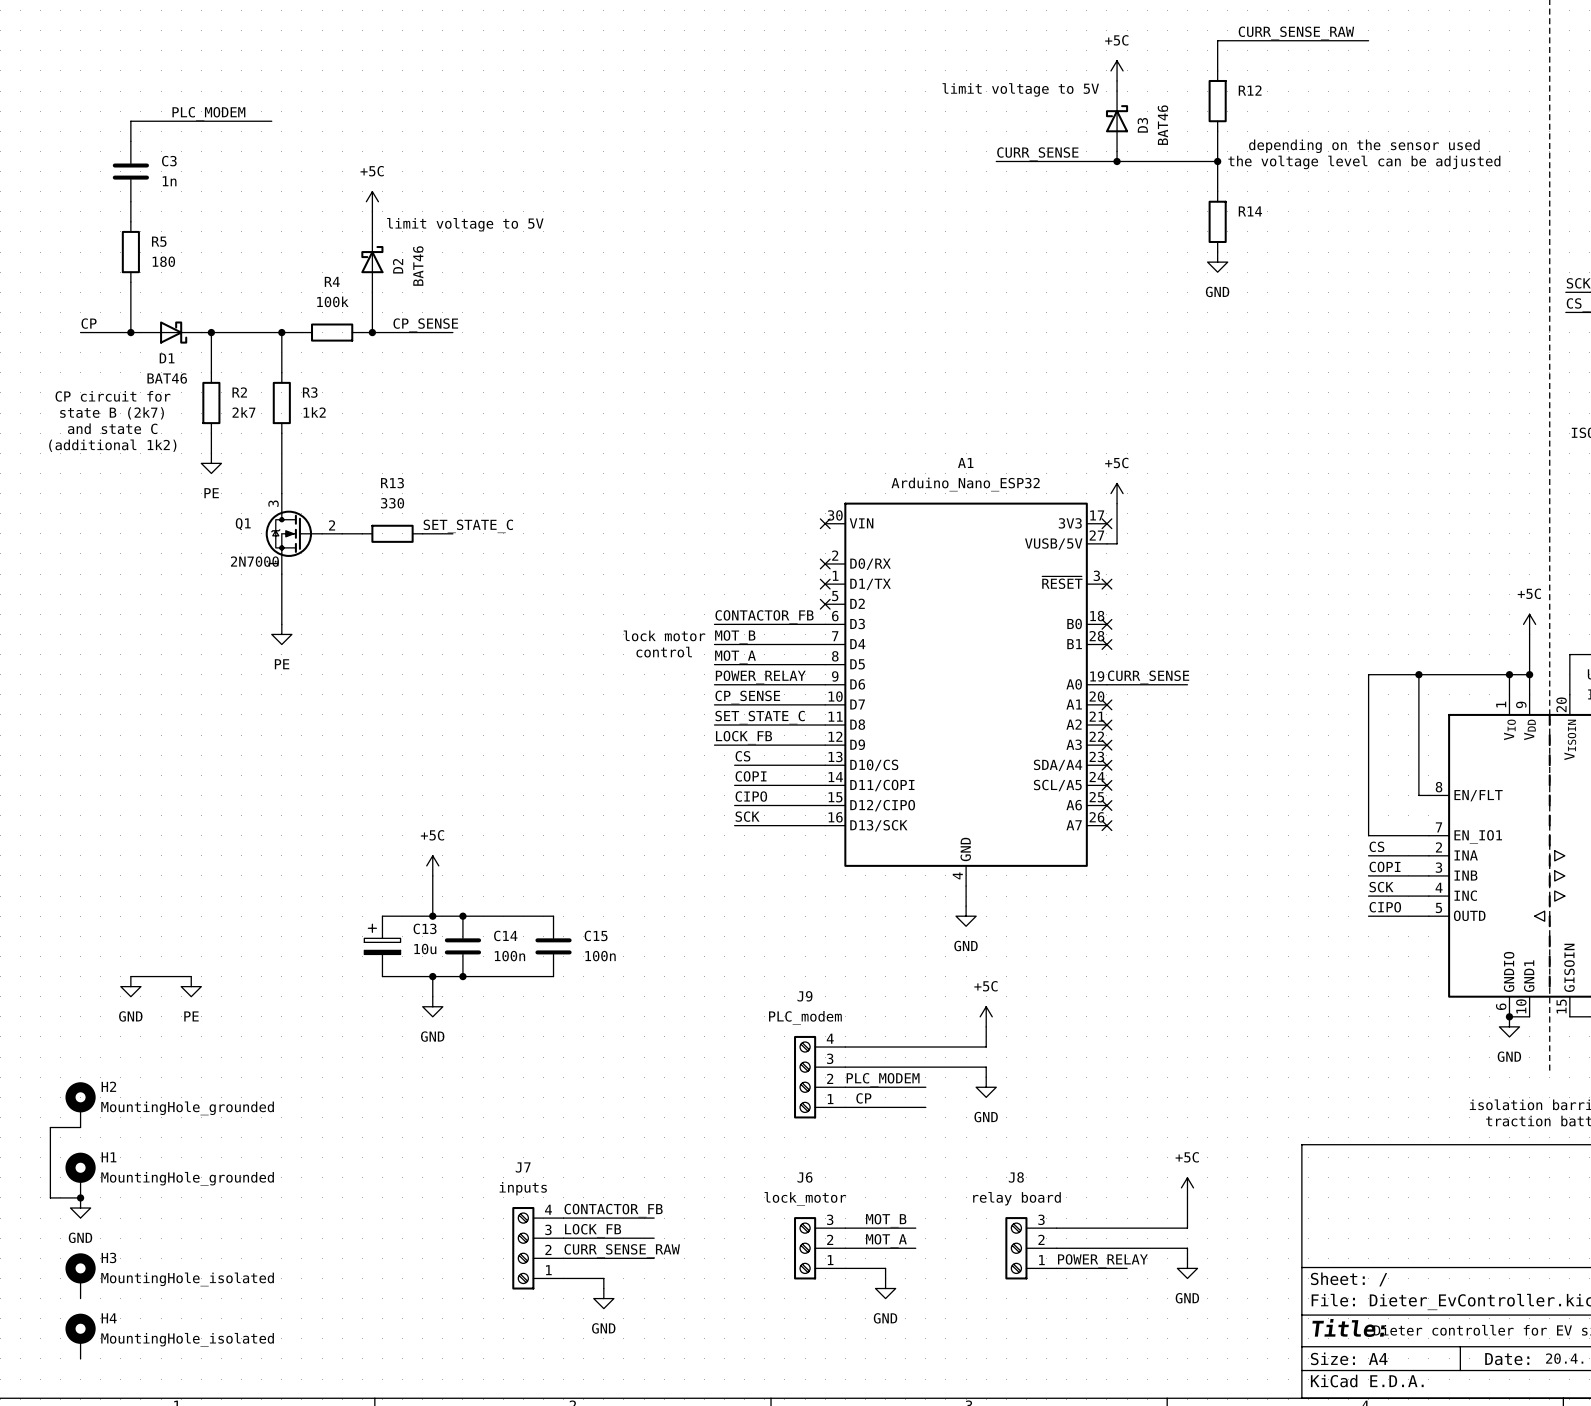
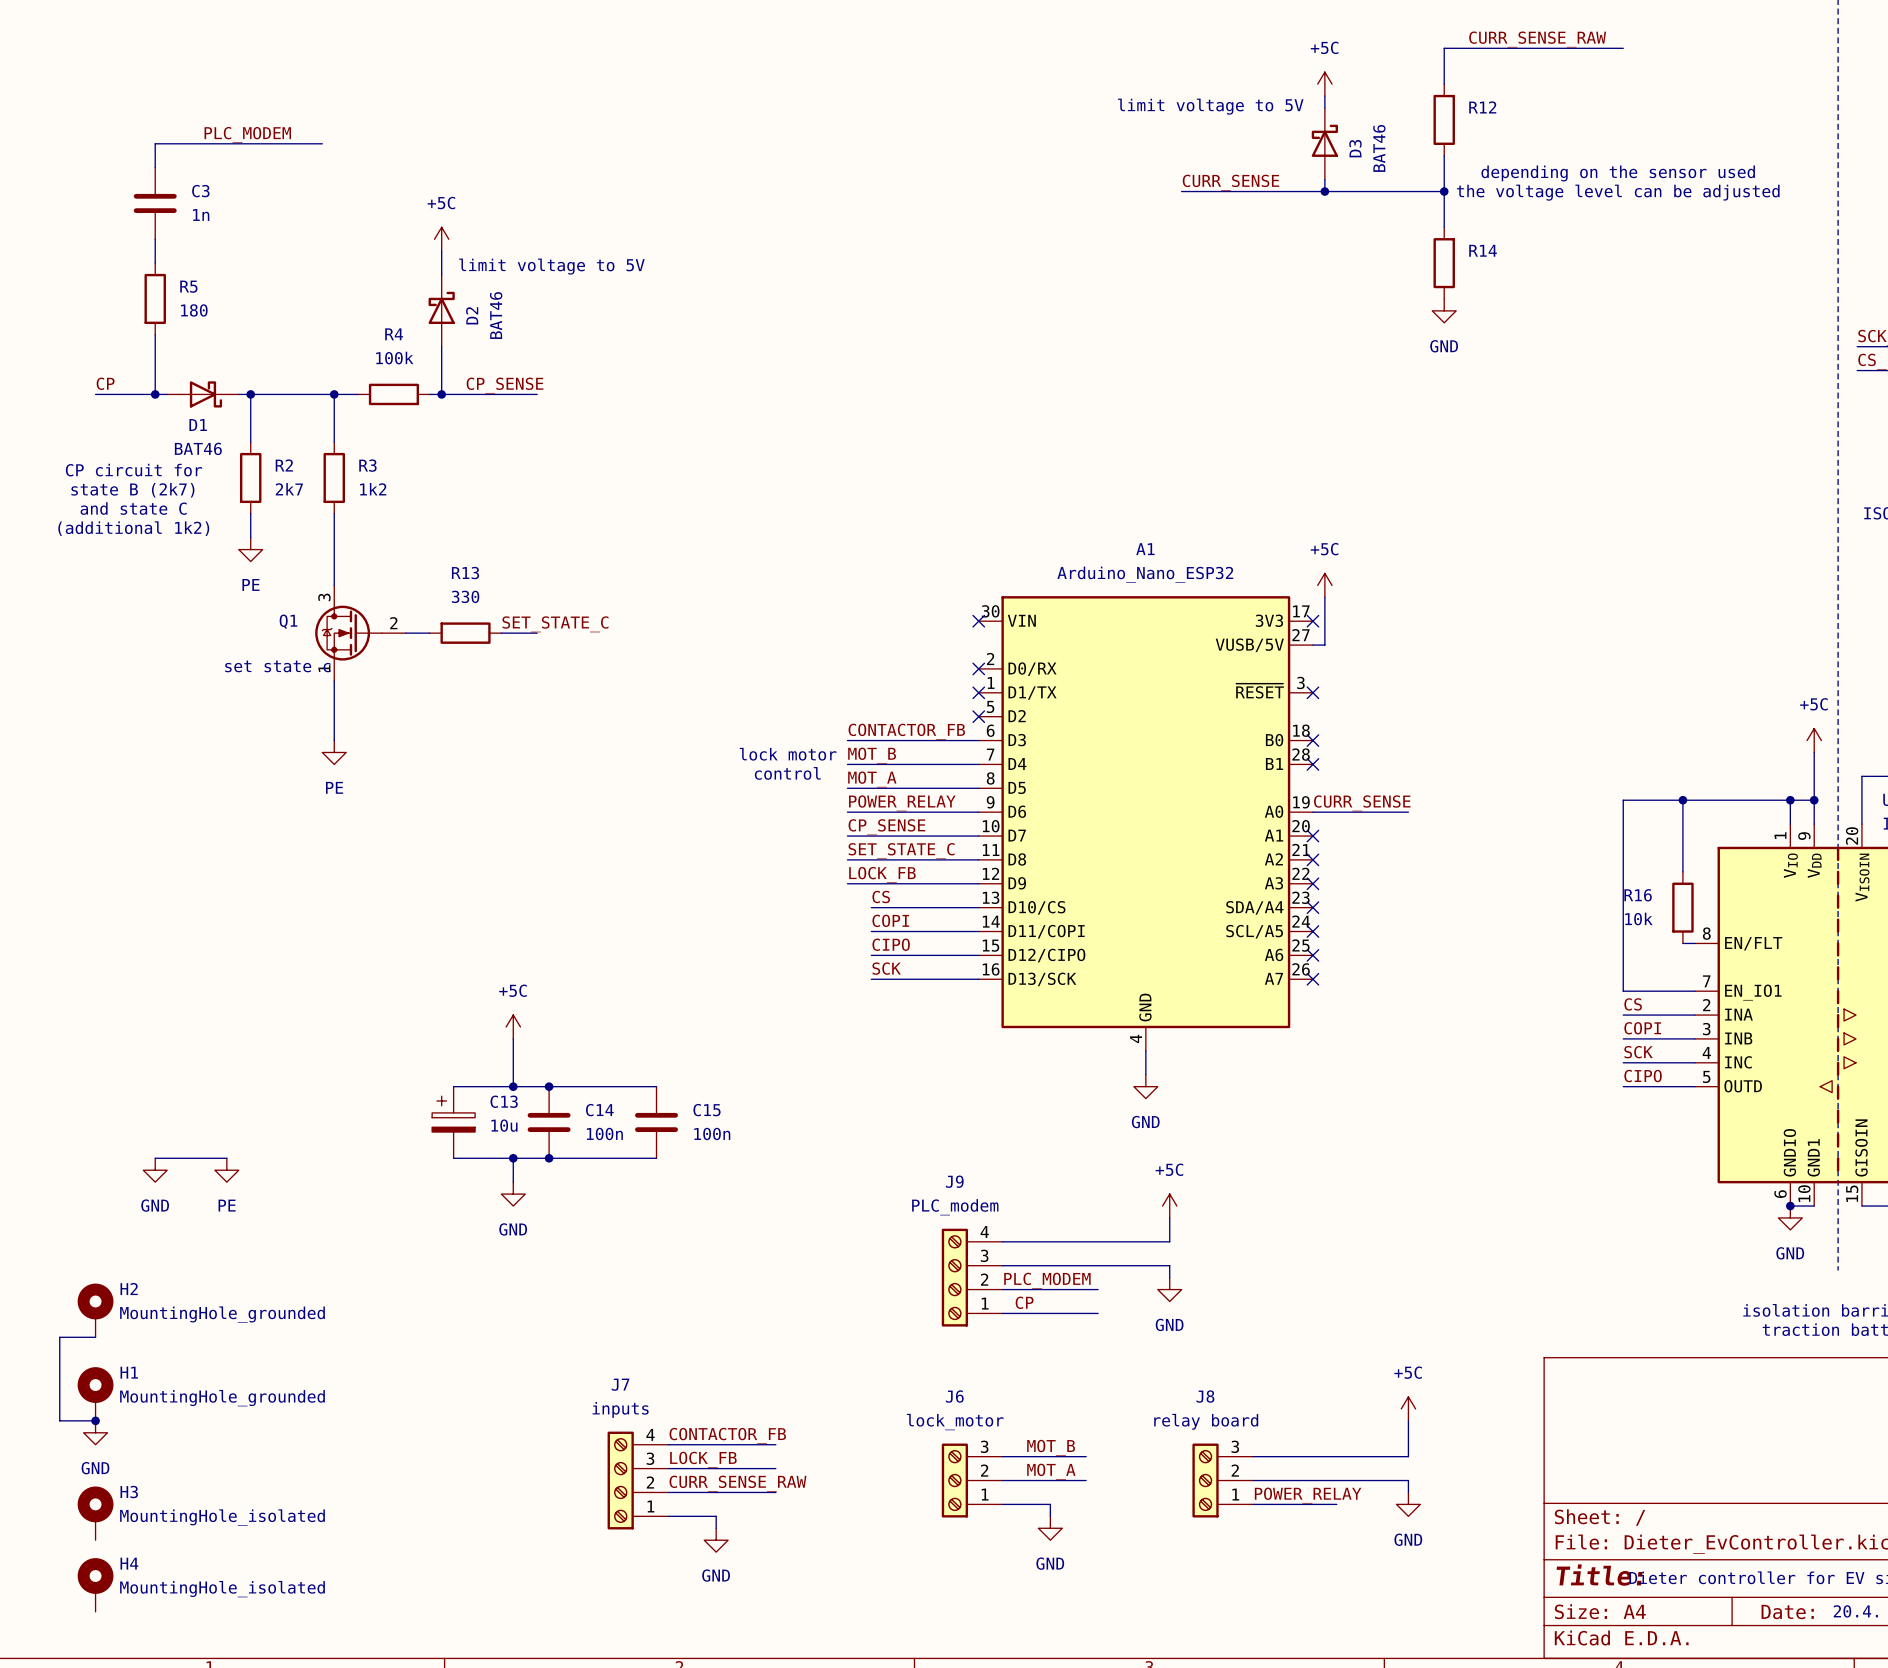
Q1 value: 2N7000 (254, 561) -> set state c (277, 666)
wire: (1418, 735) (1418, 795) -> none
R16: none -> 10k (1682, 907)

